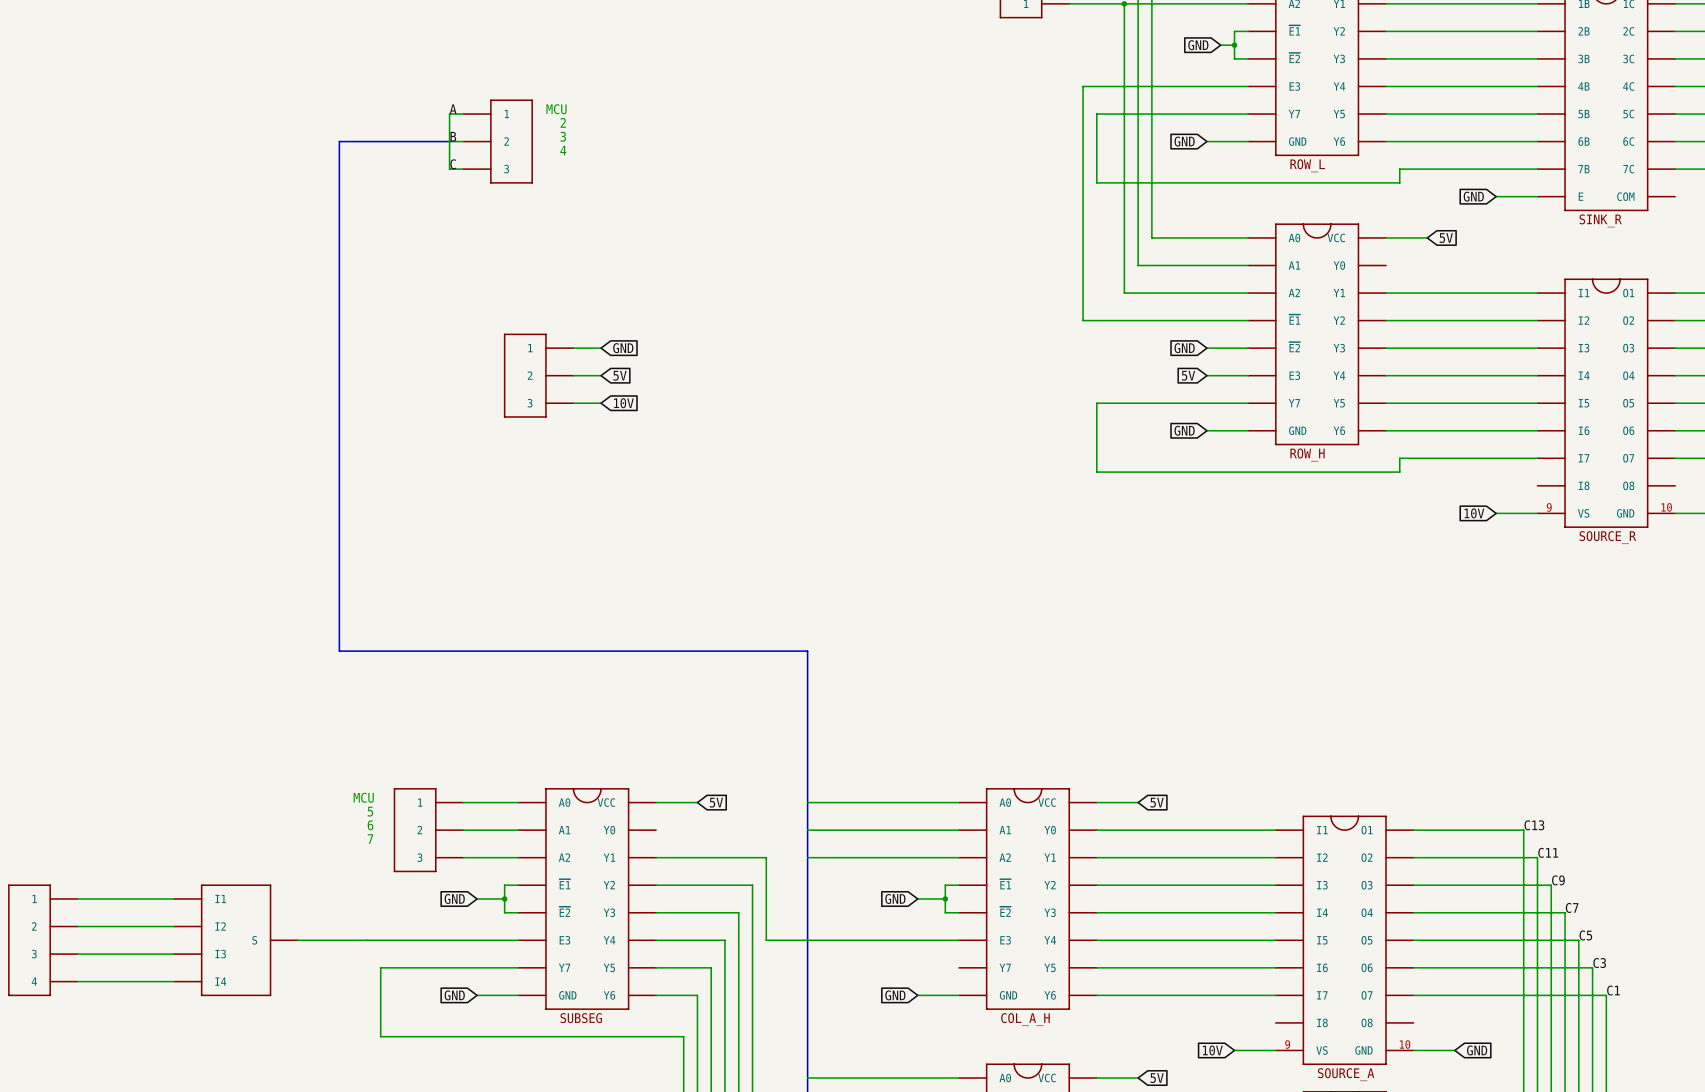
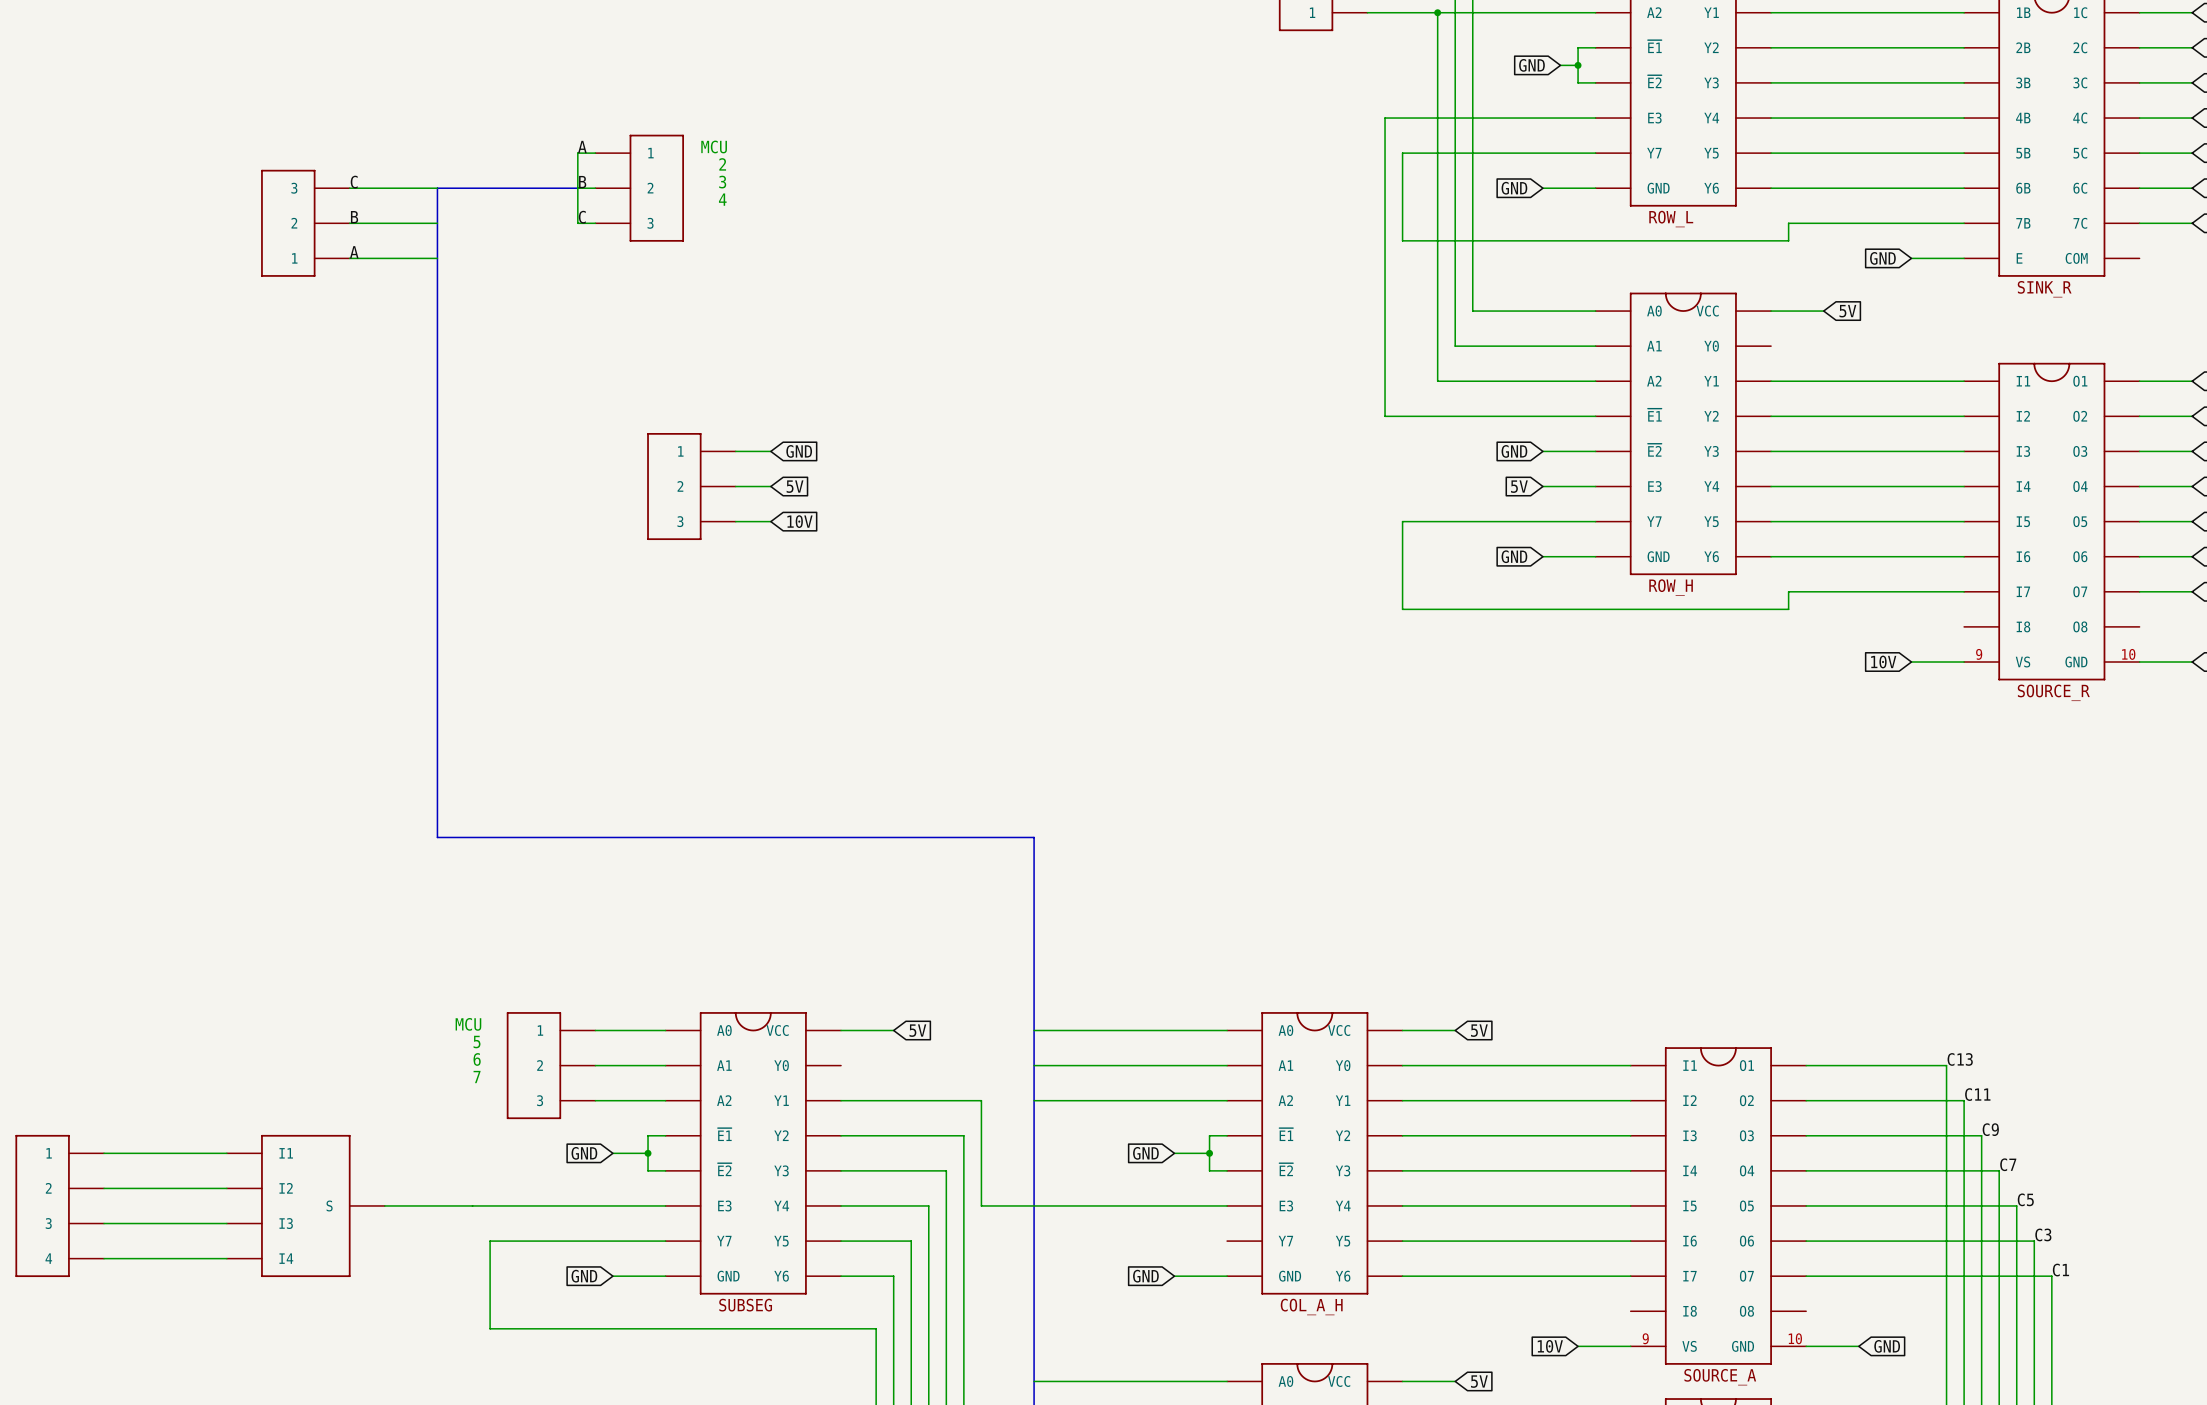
label: none -> C (354, 182)
wire: none -> (349, 188) (437, 188)
label: none -> B (354, 217)
part: none -> (305, 223)
wire: none -> (349, 223) (437, 223)
label: none -> A (354, 252)
wire: none -> (349, 258) (437, 258)

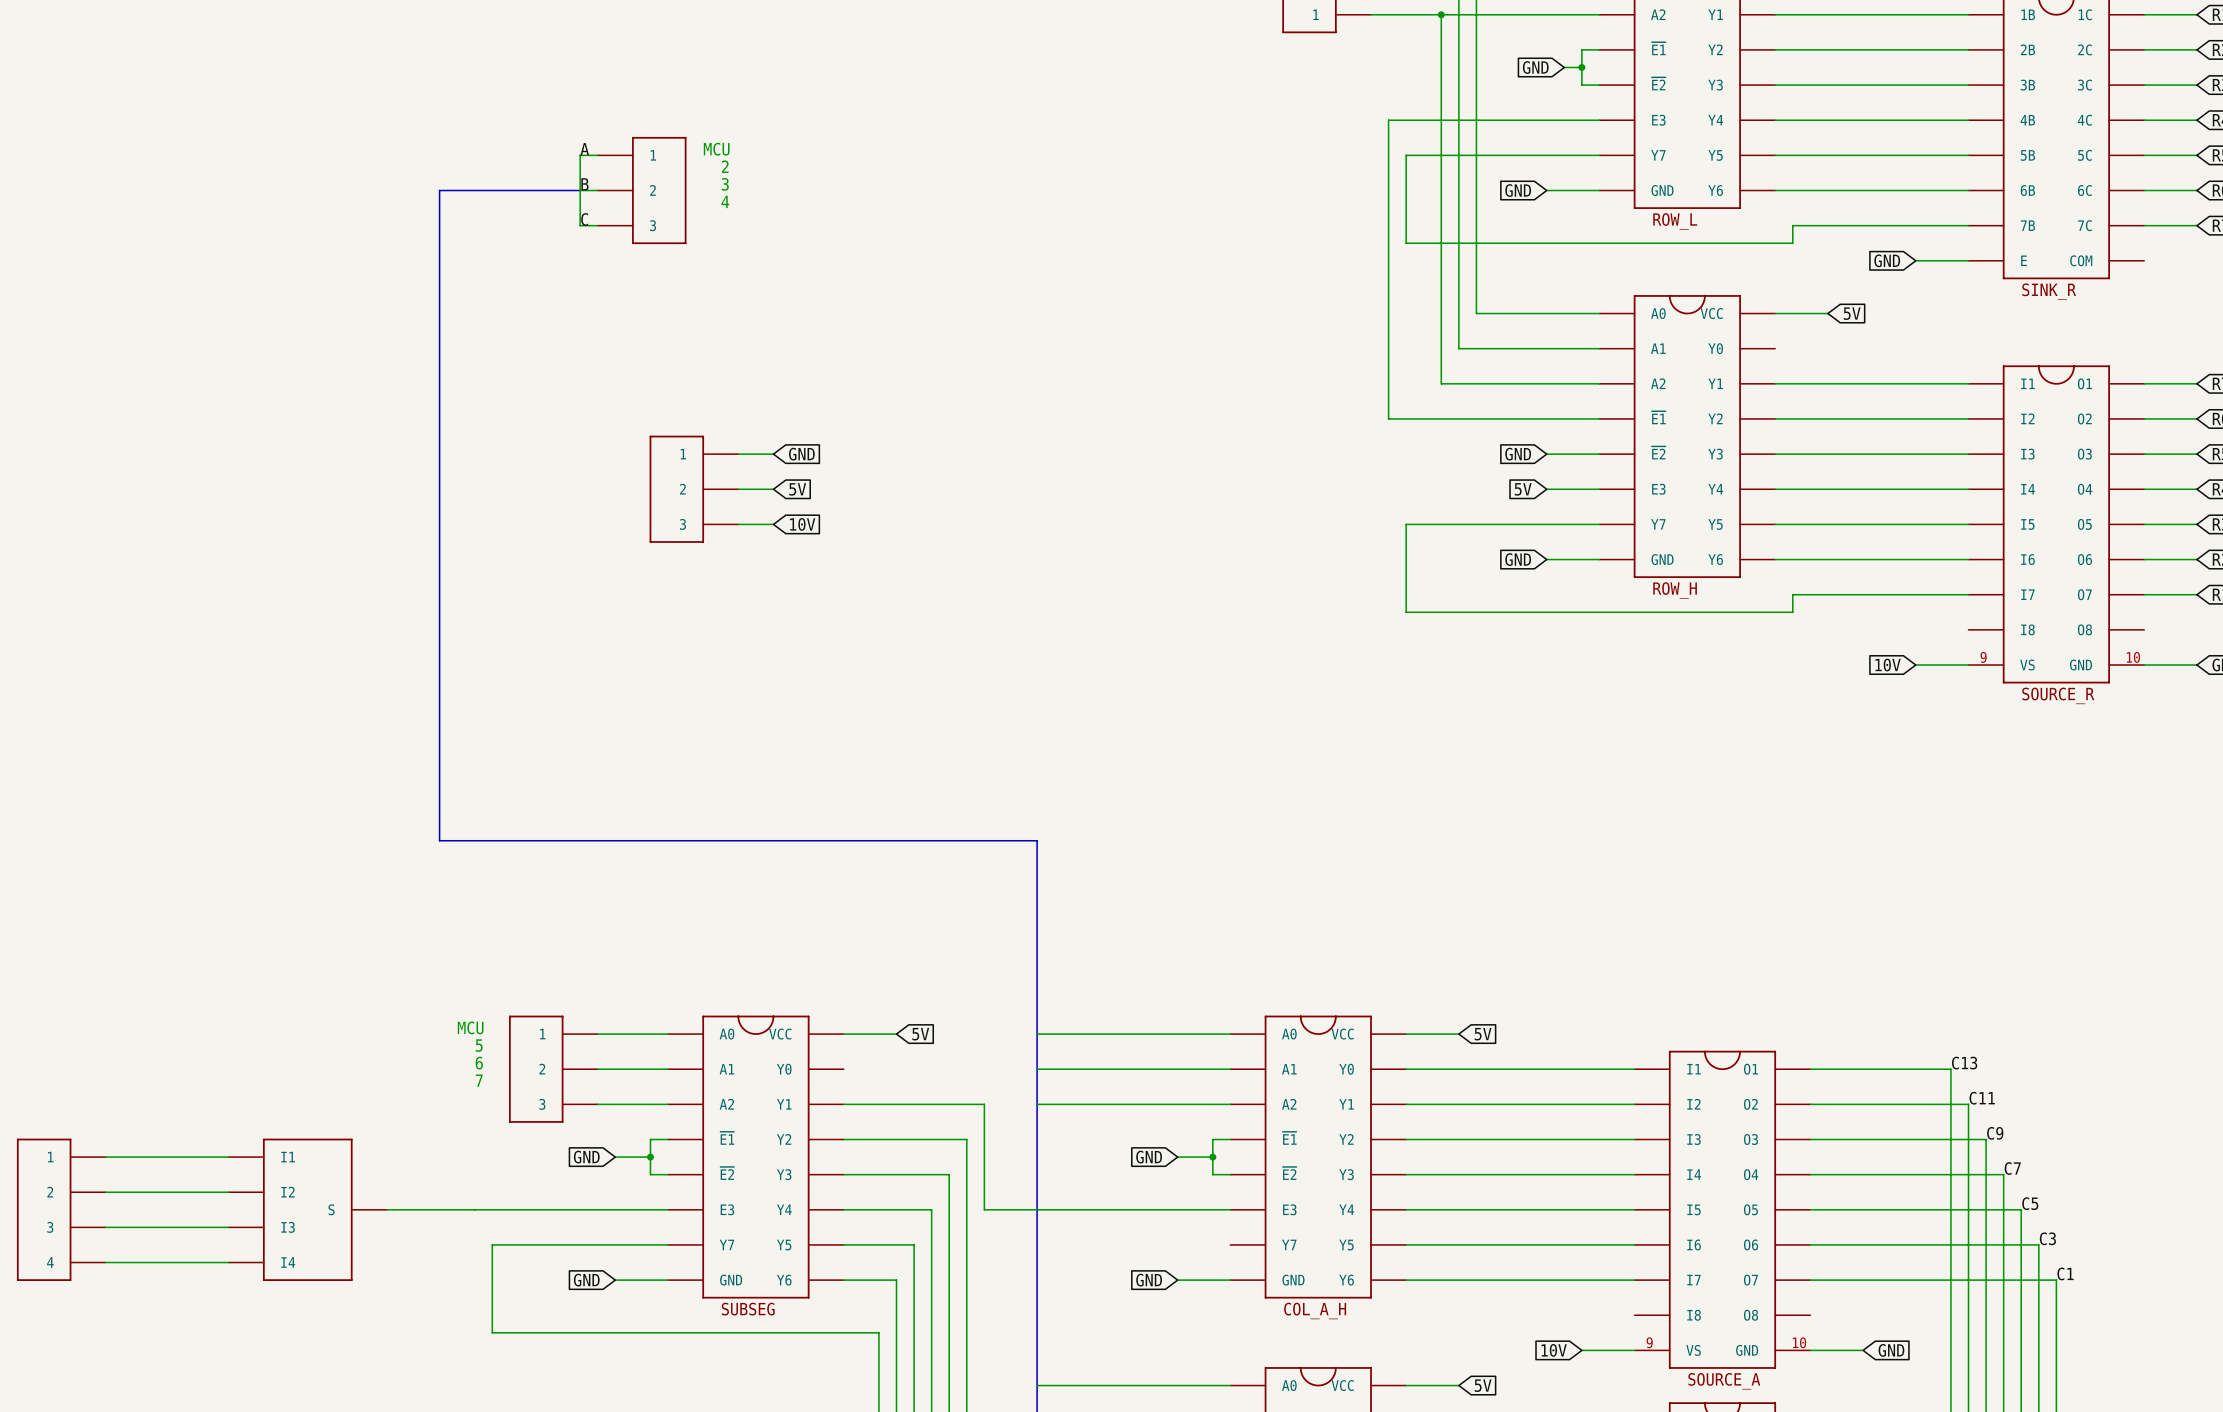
label: C (354, 182) -> none
wire: (349, 188) (437, 188) -> none
label: B (354, 217) -> none
part: (305, 223) -> none
wire: (349, 223) (437, 223) -> none
label: A (354, 252) -> none
wire: (349, 258) (437, 258) -> none

